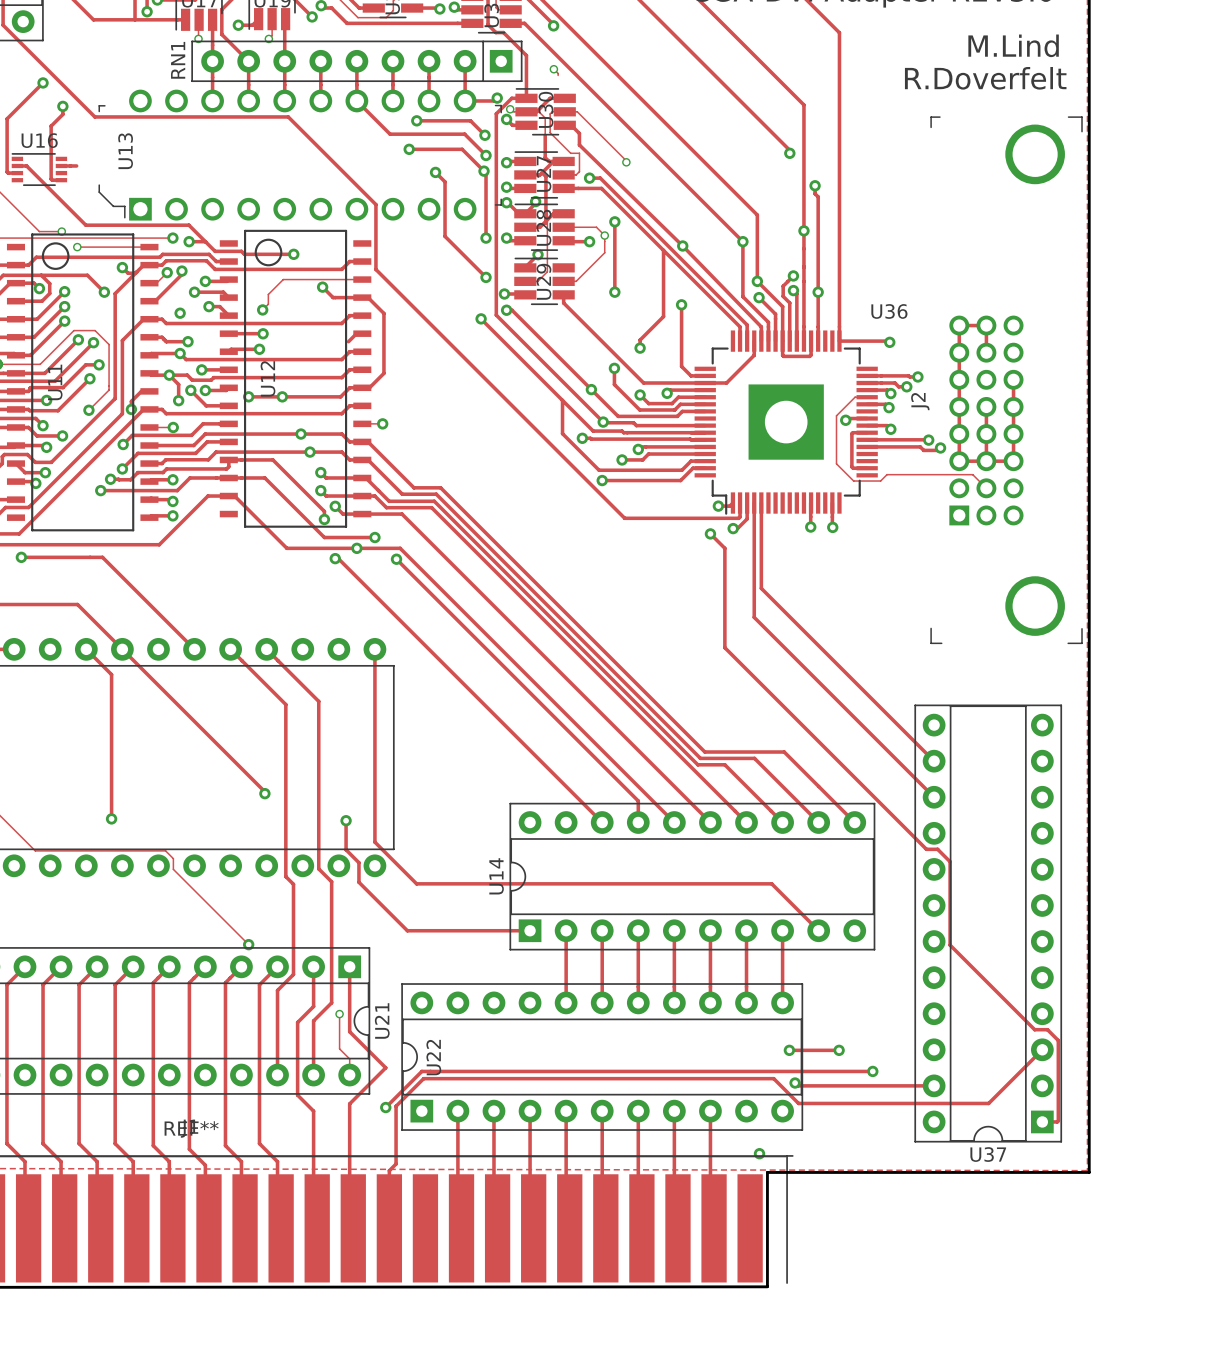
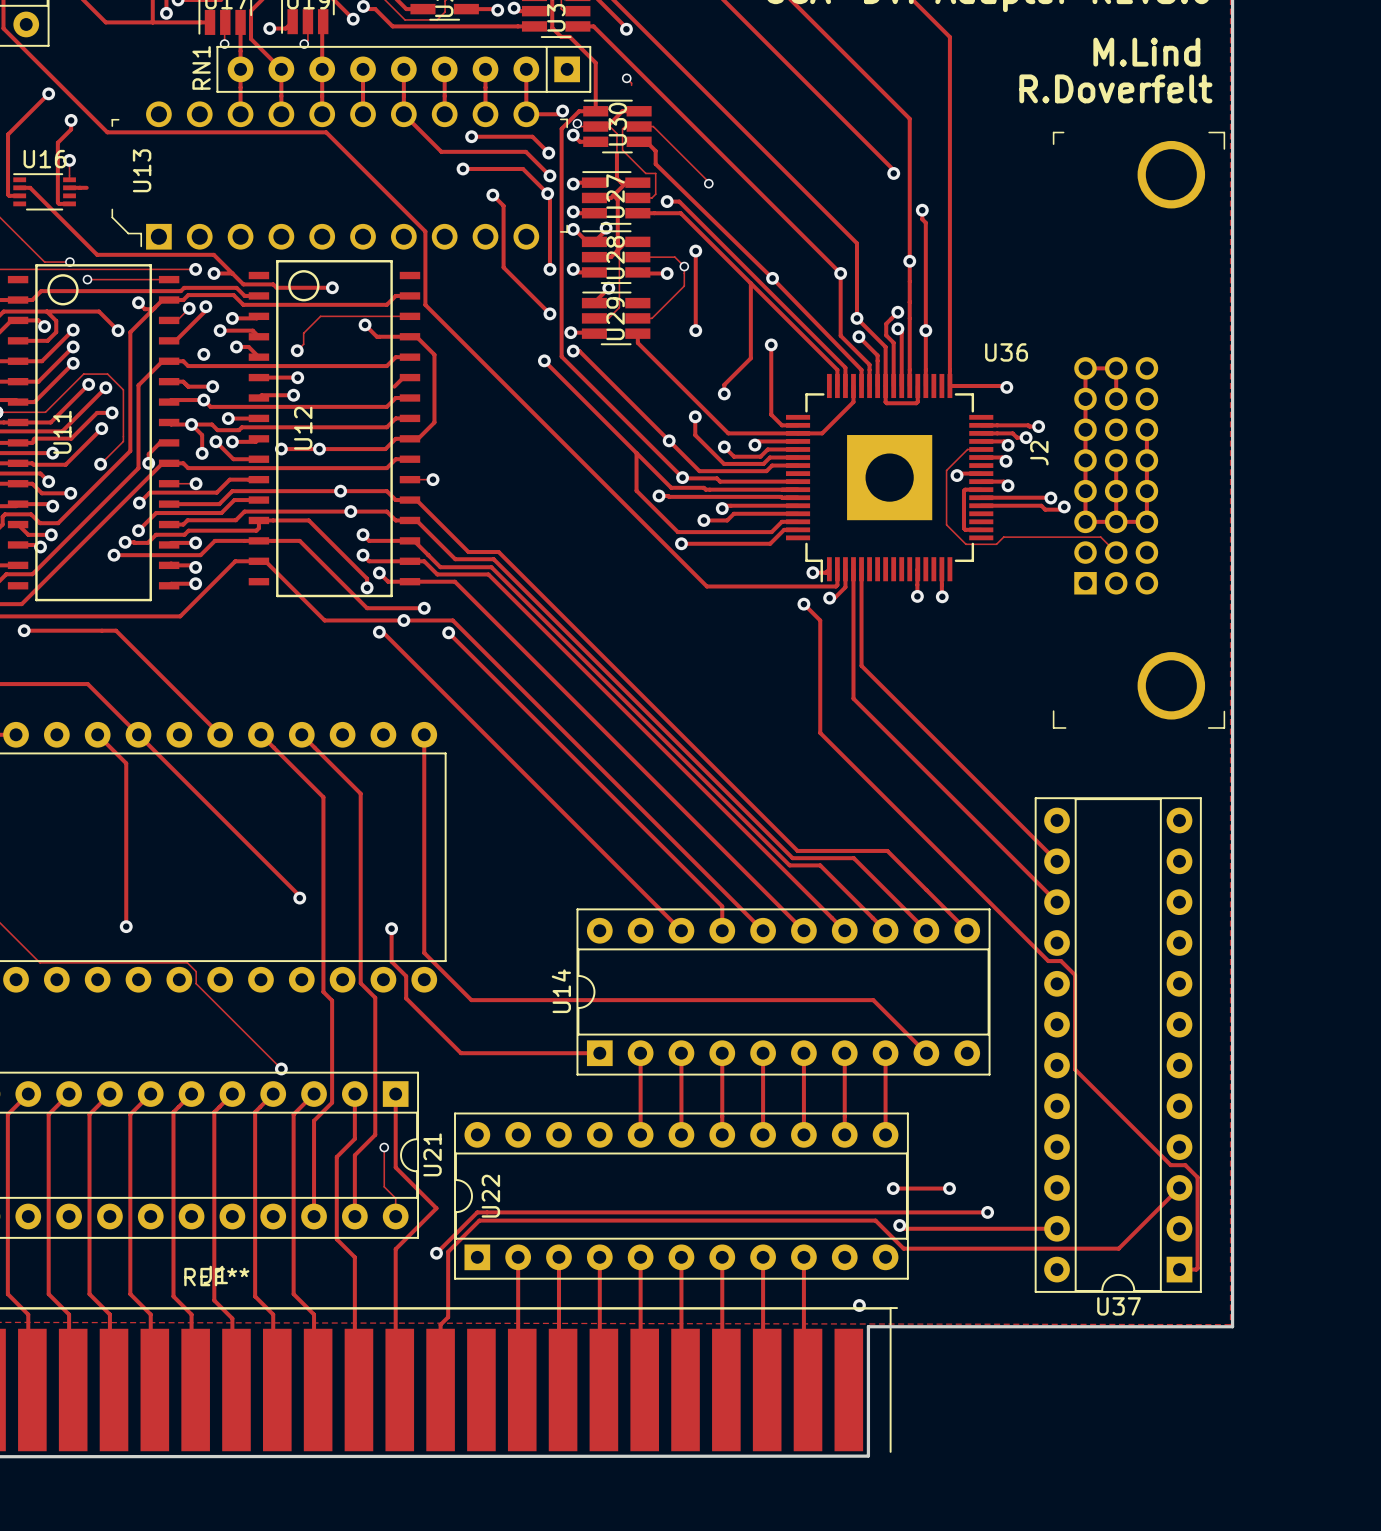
track: none -> (69, 160) (69, 179)
via: none -> (69, 160)

